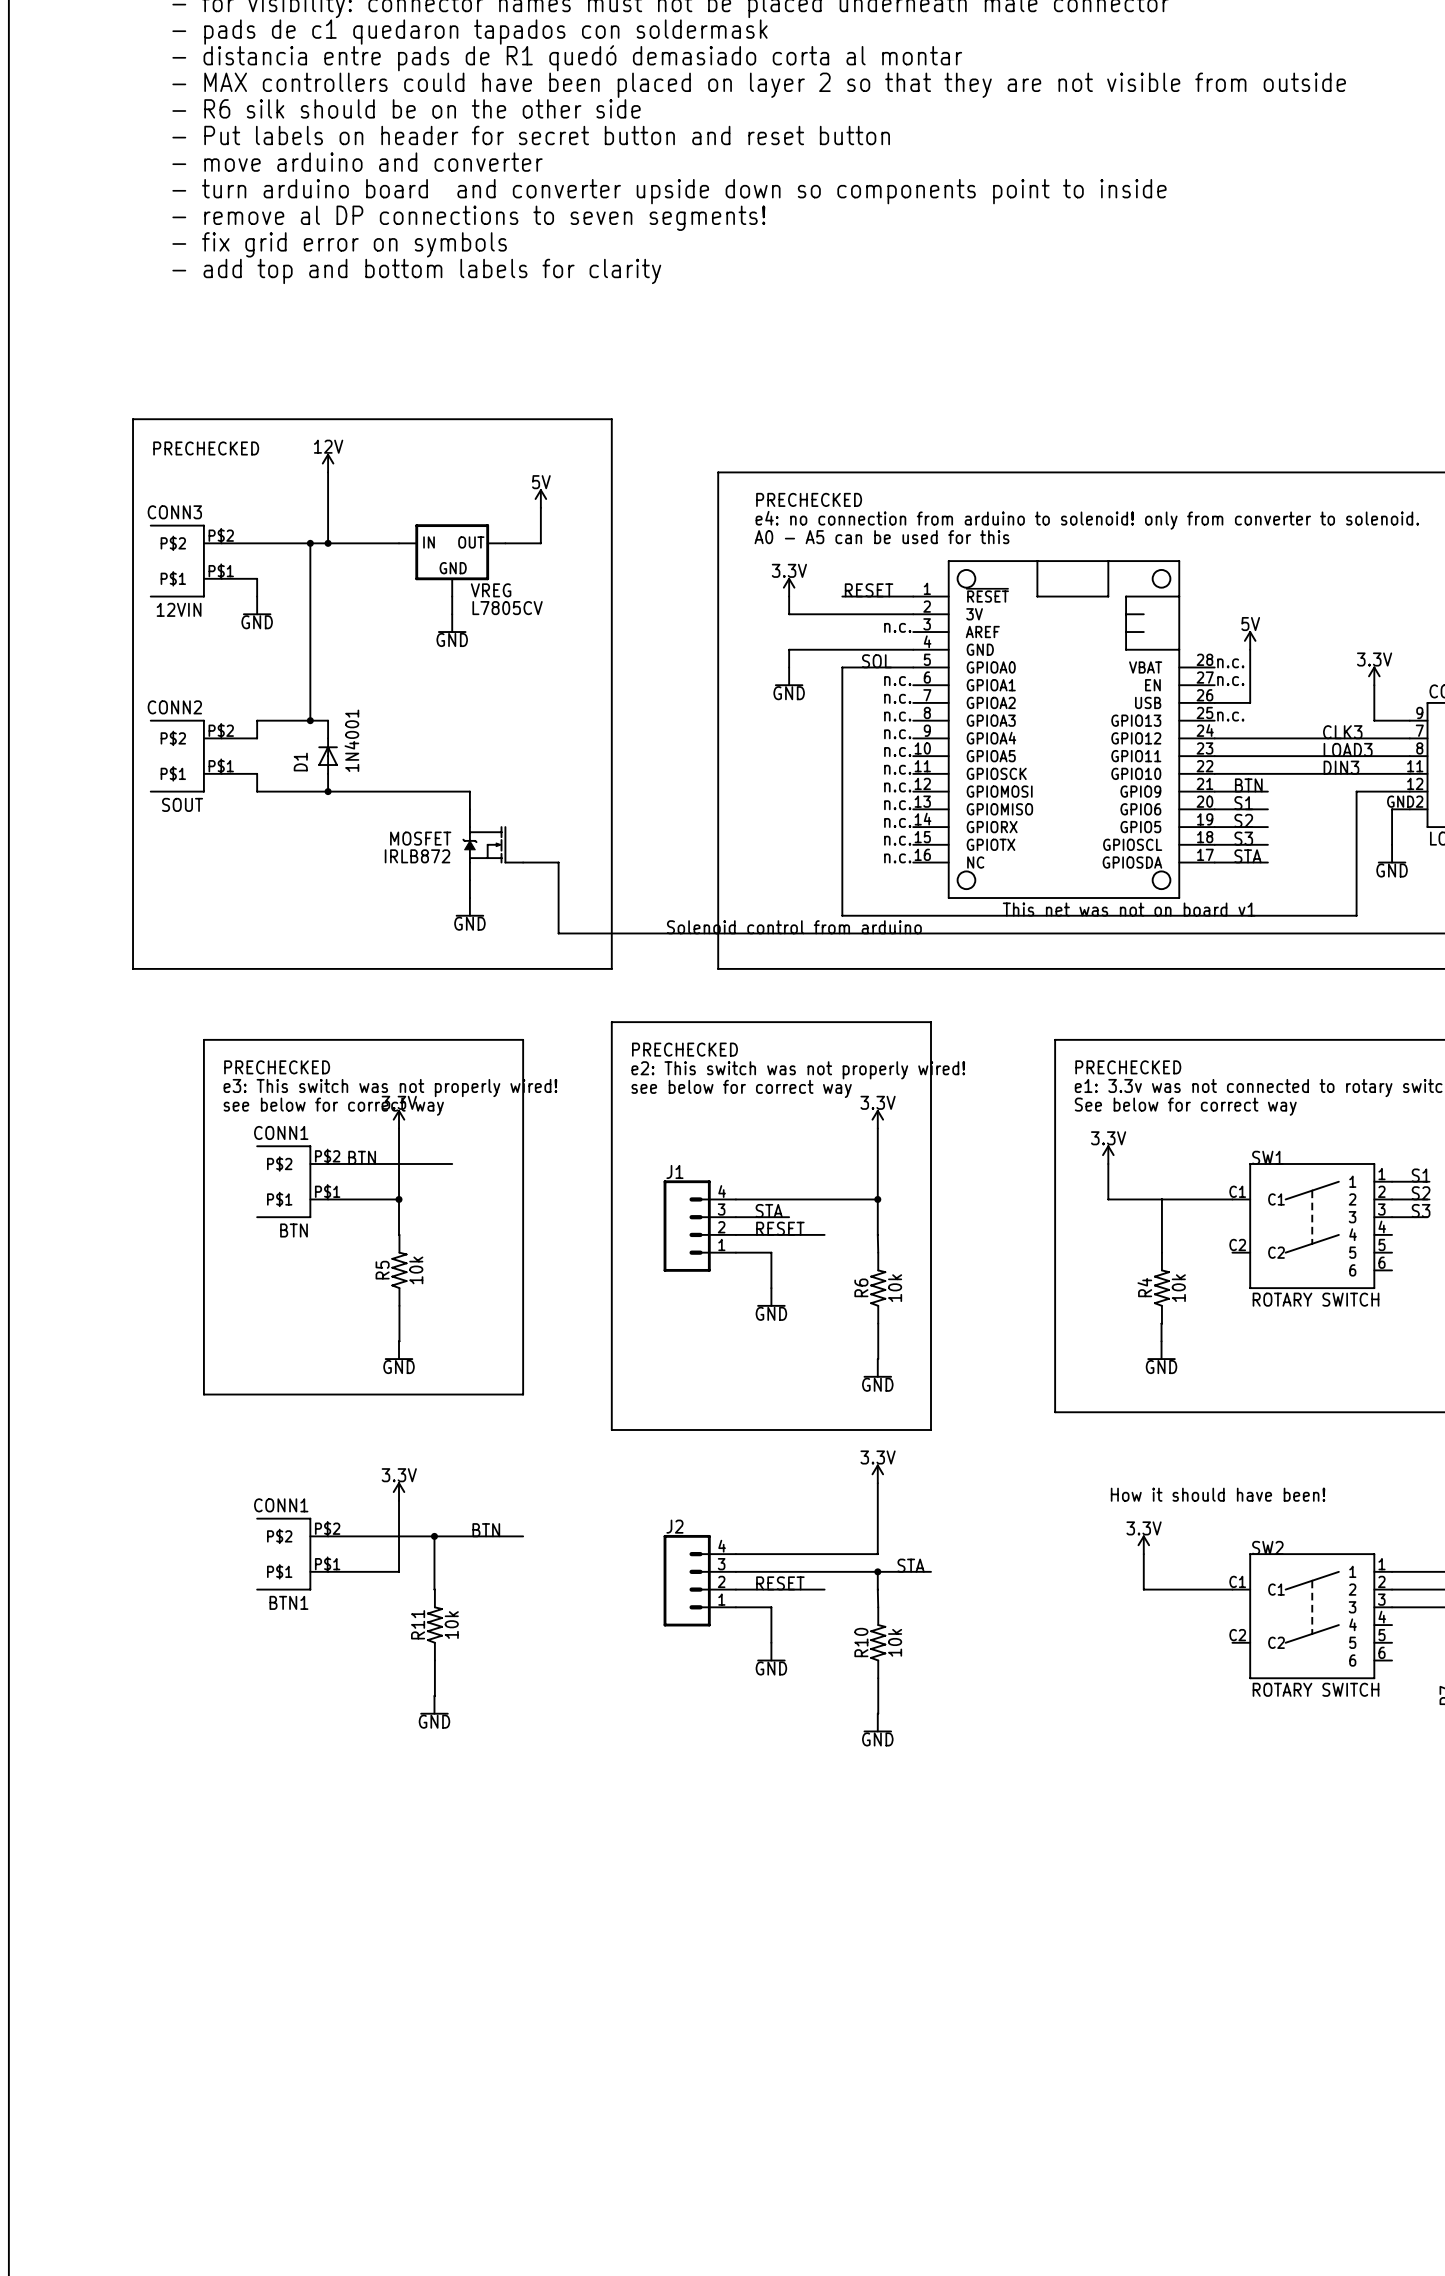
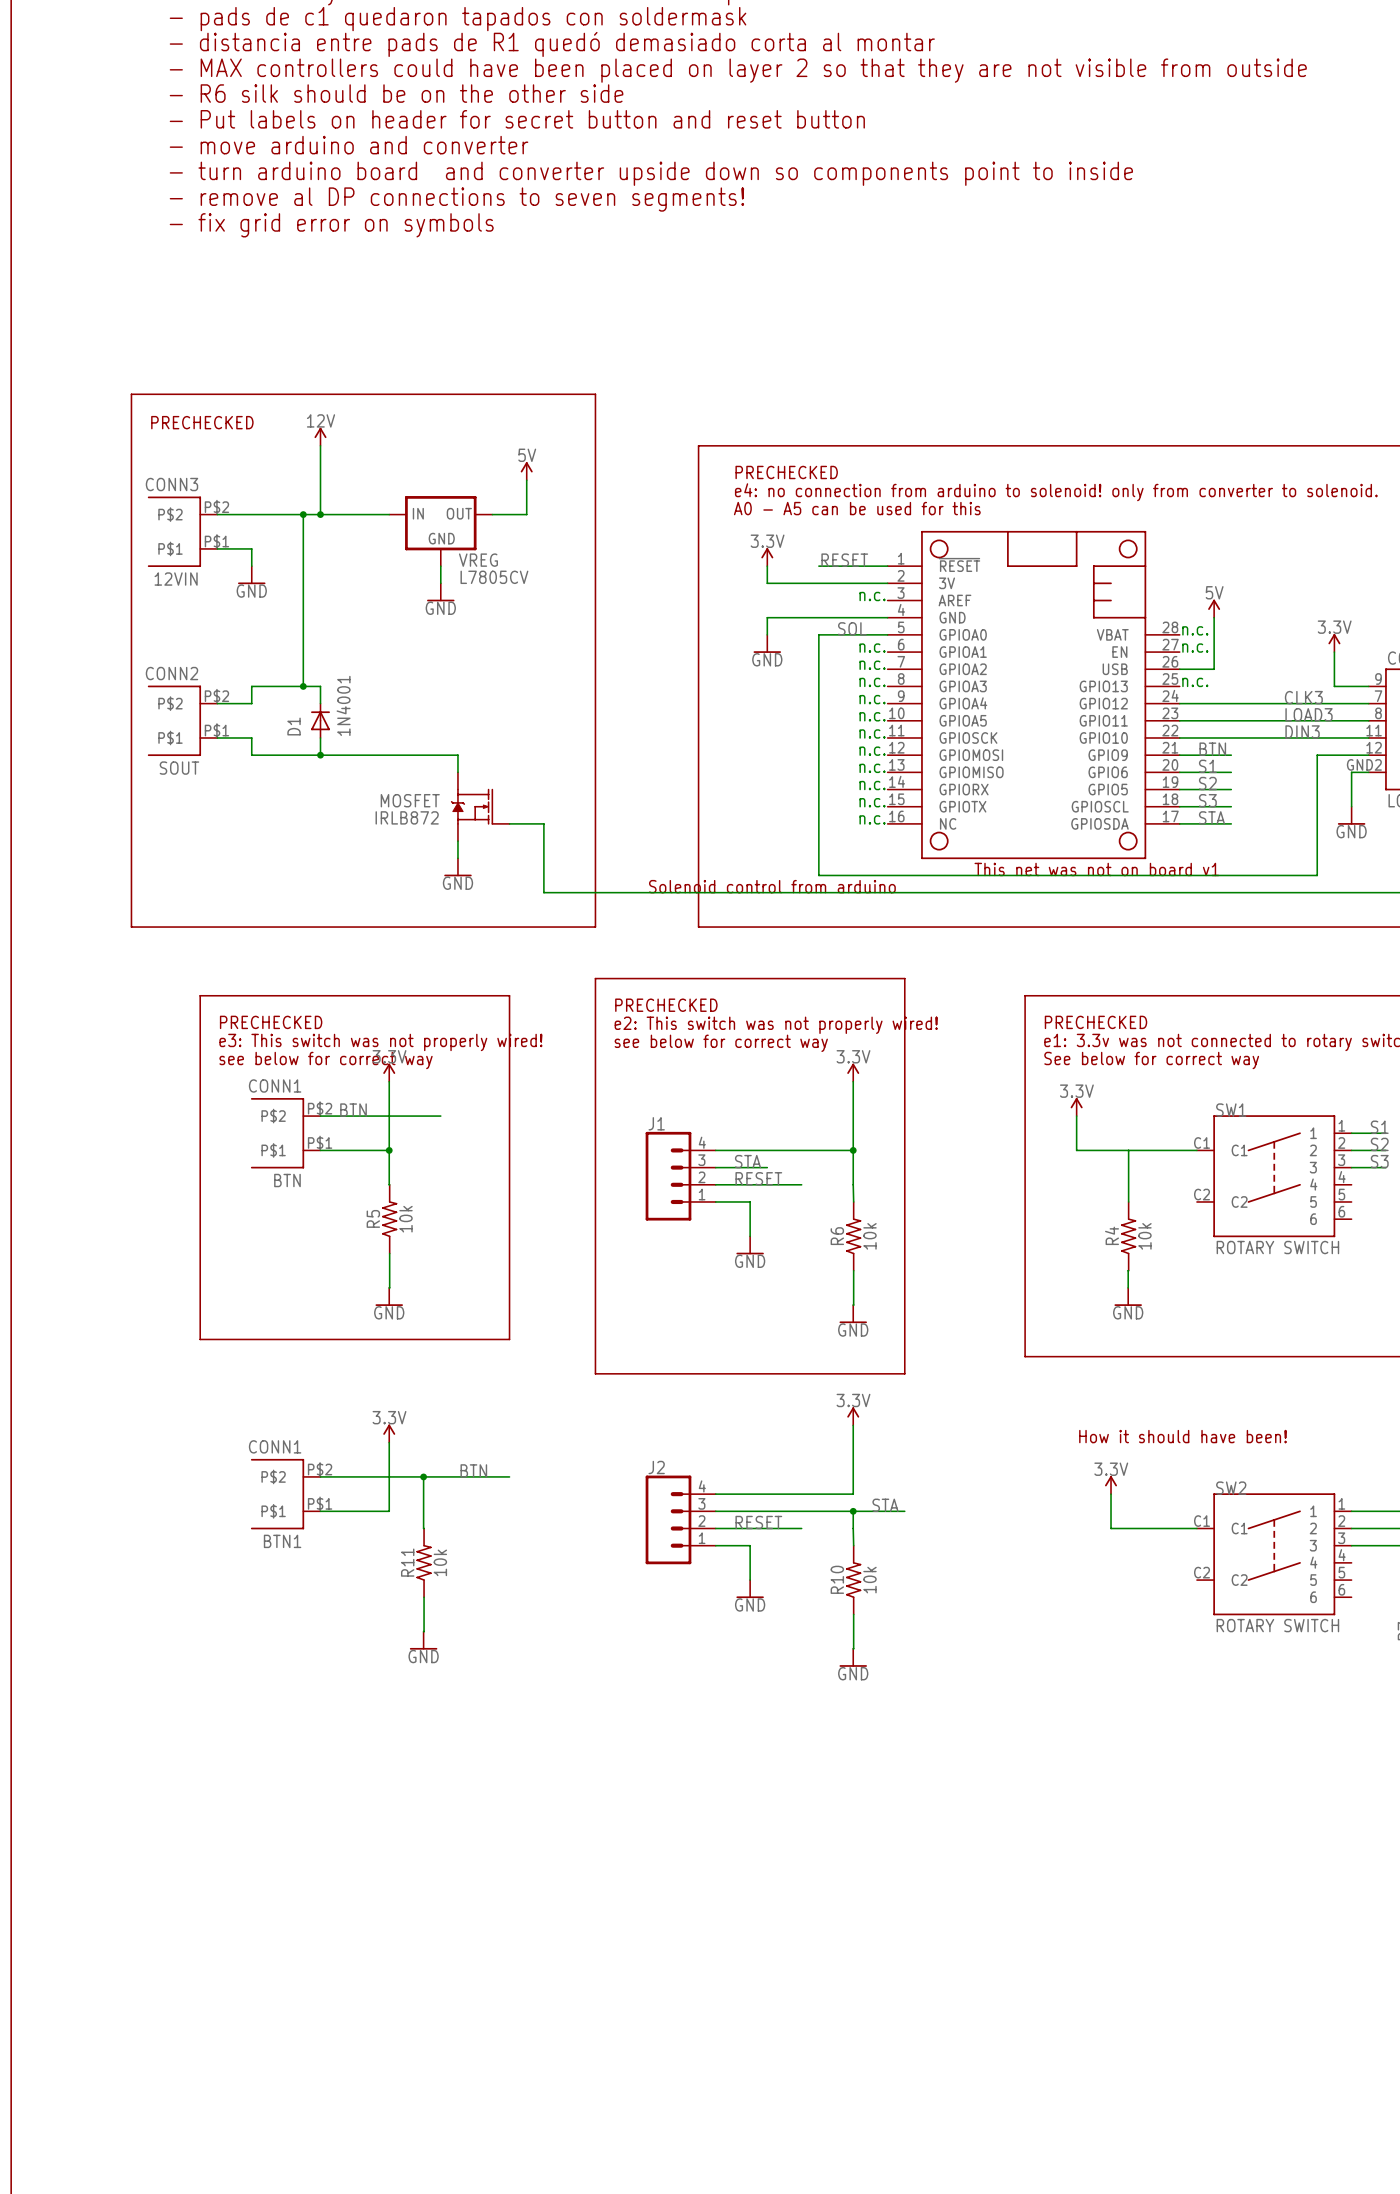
text: - add top and bottom labels for clarity (416, 271) -> none

